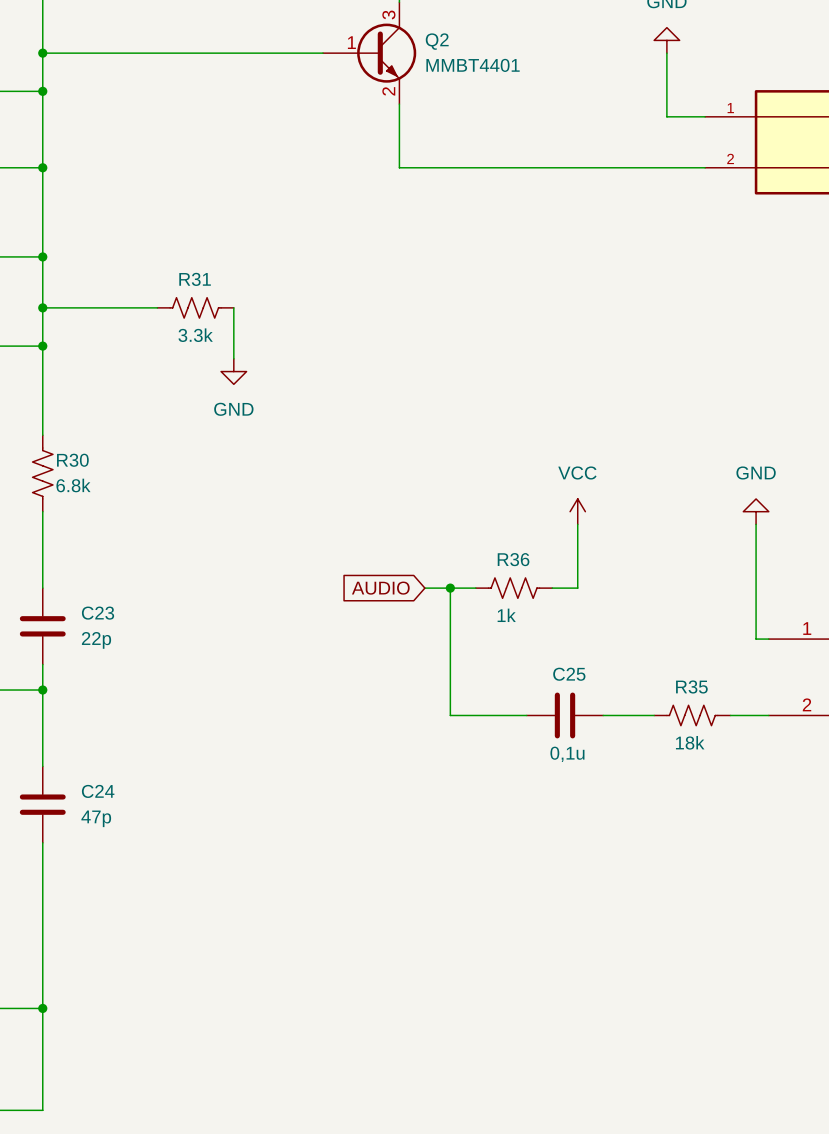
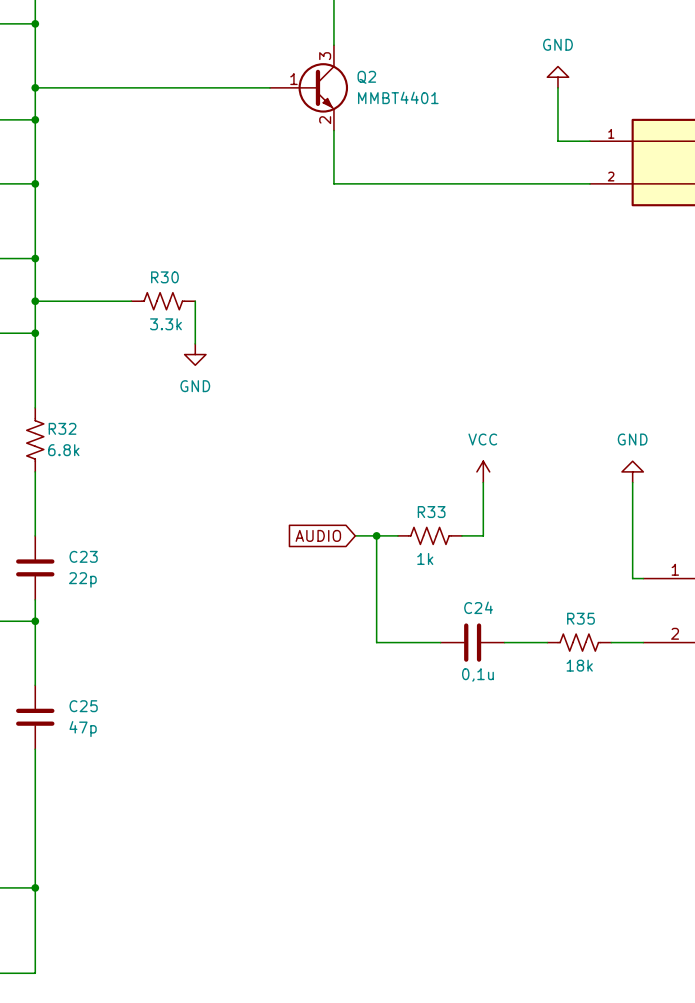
R31 name: R31 (195, 279) -> R30 (164, 277)
R30 name: R30 (72, 460) -> R32 (62, 428)
R36 name: R36 (513, 559) -> R33 (431, 512)
C25 name: C25 (569, 674) -> C24 (478, 607)
C24 name: C24 (98, 791) -> C25 (83, 706)

